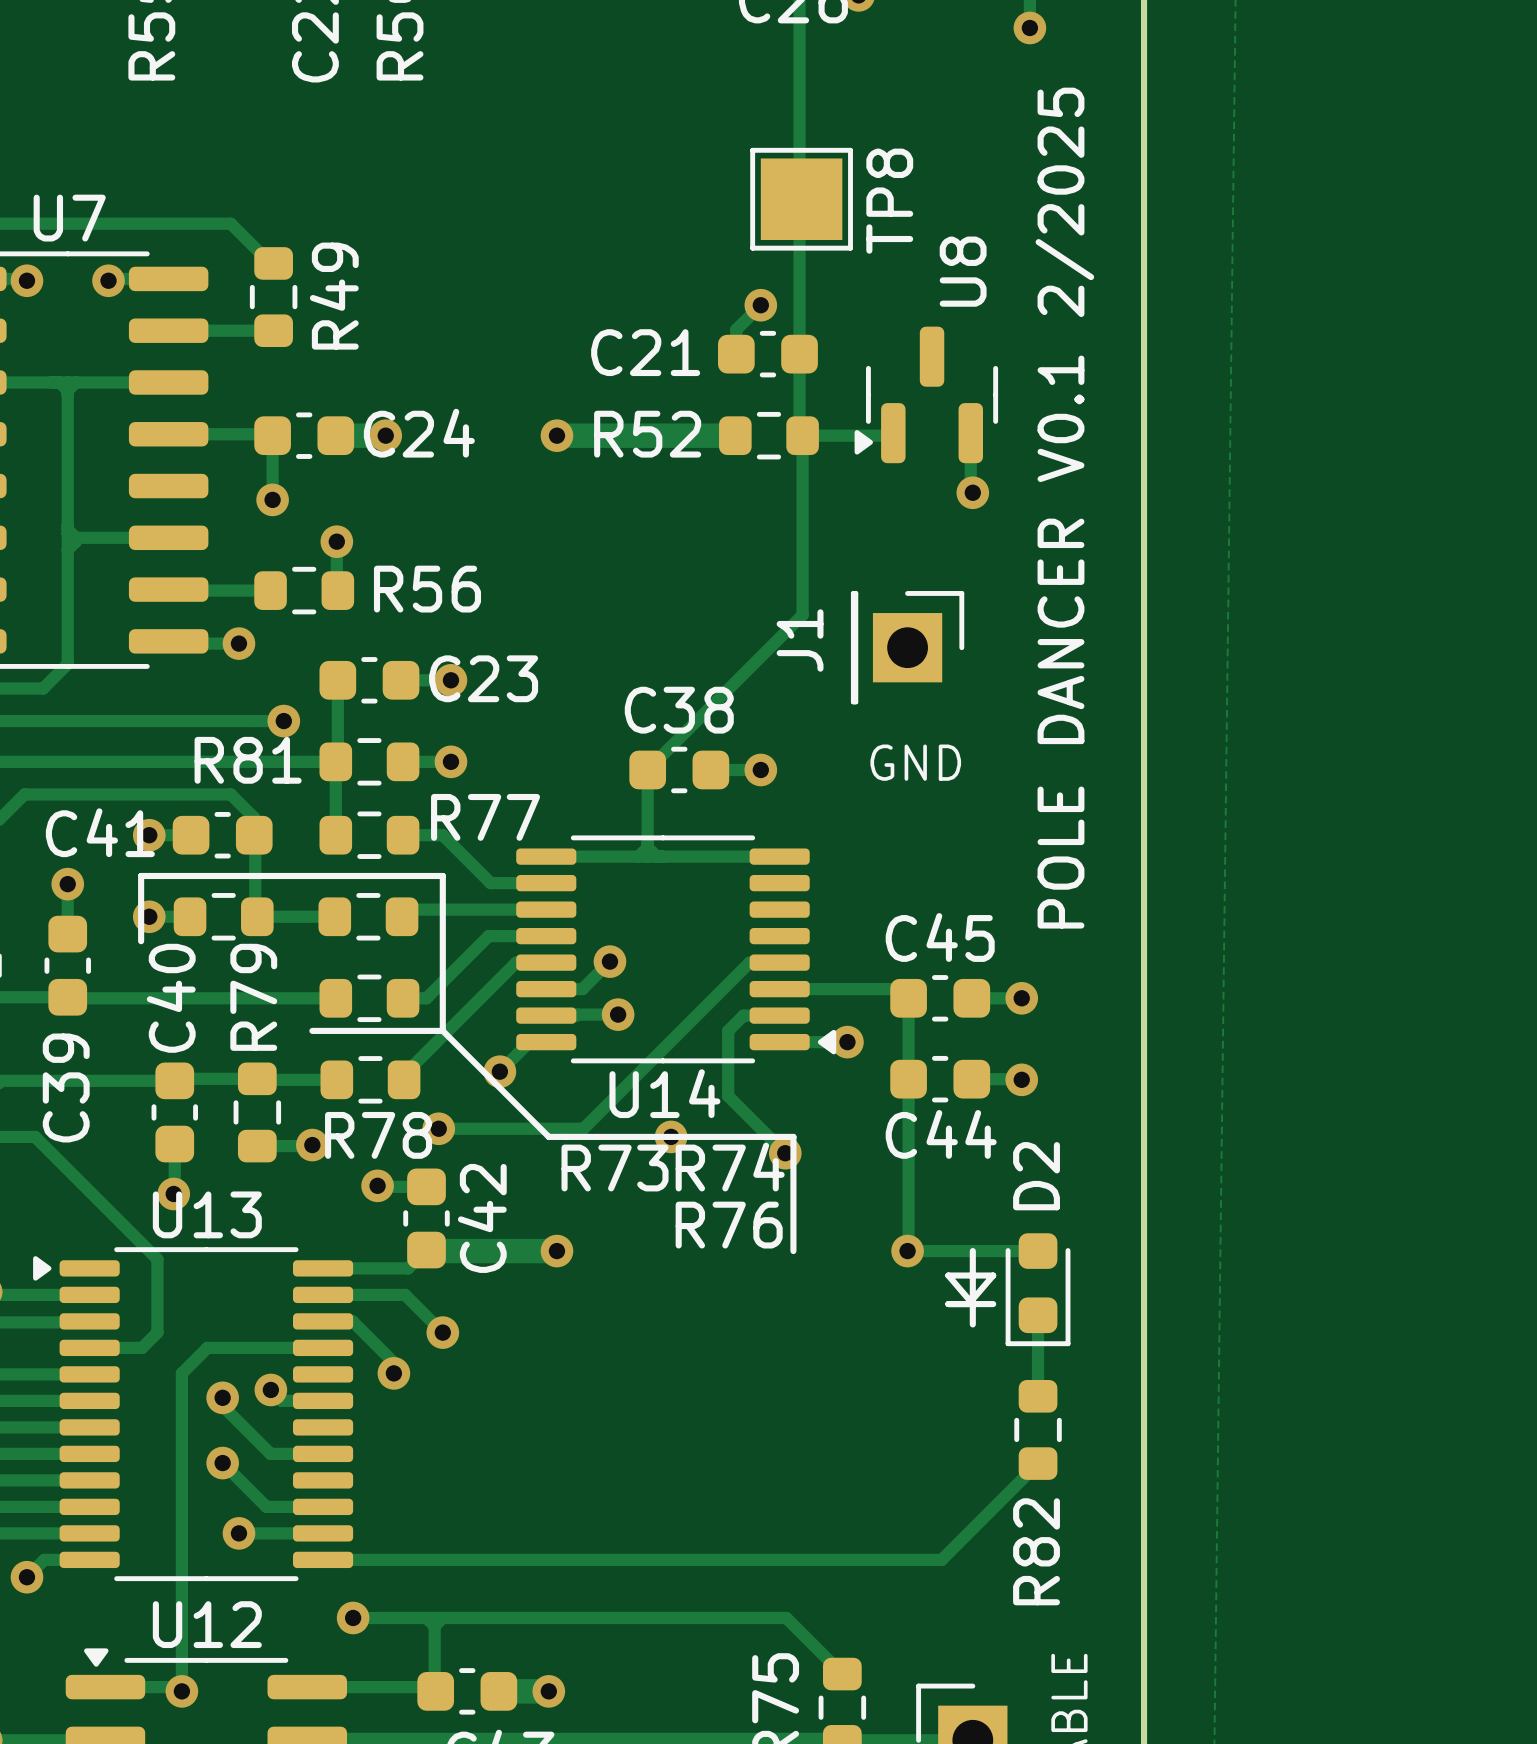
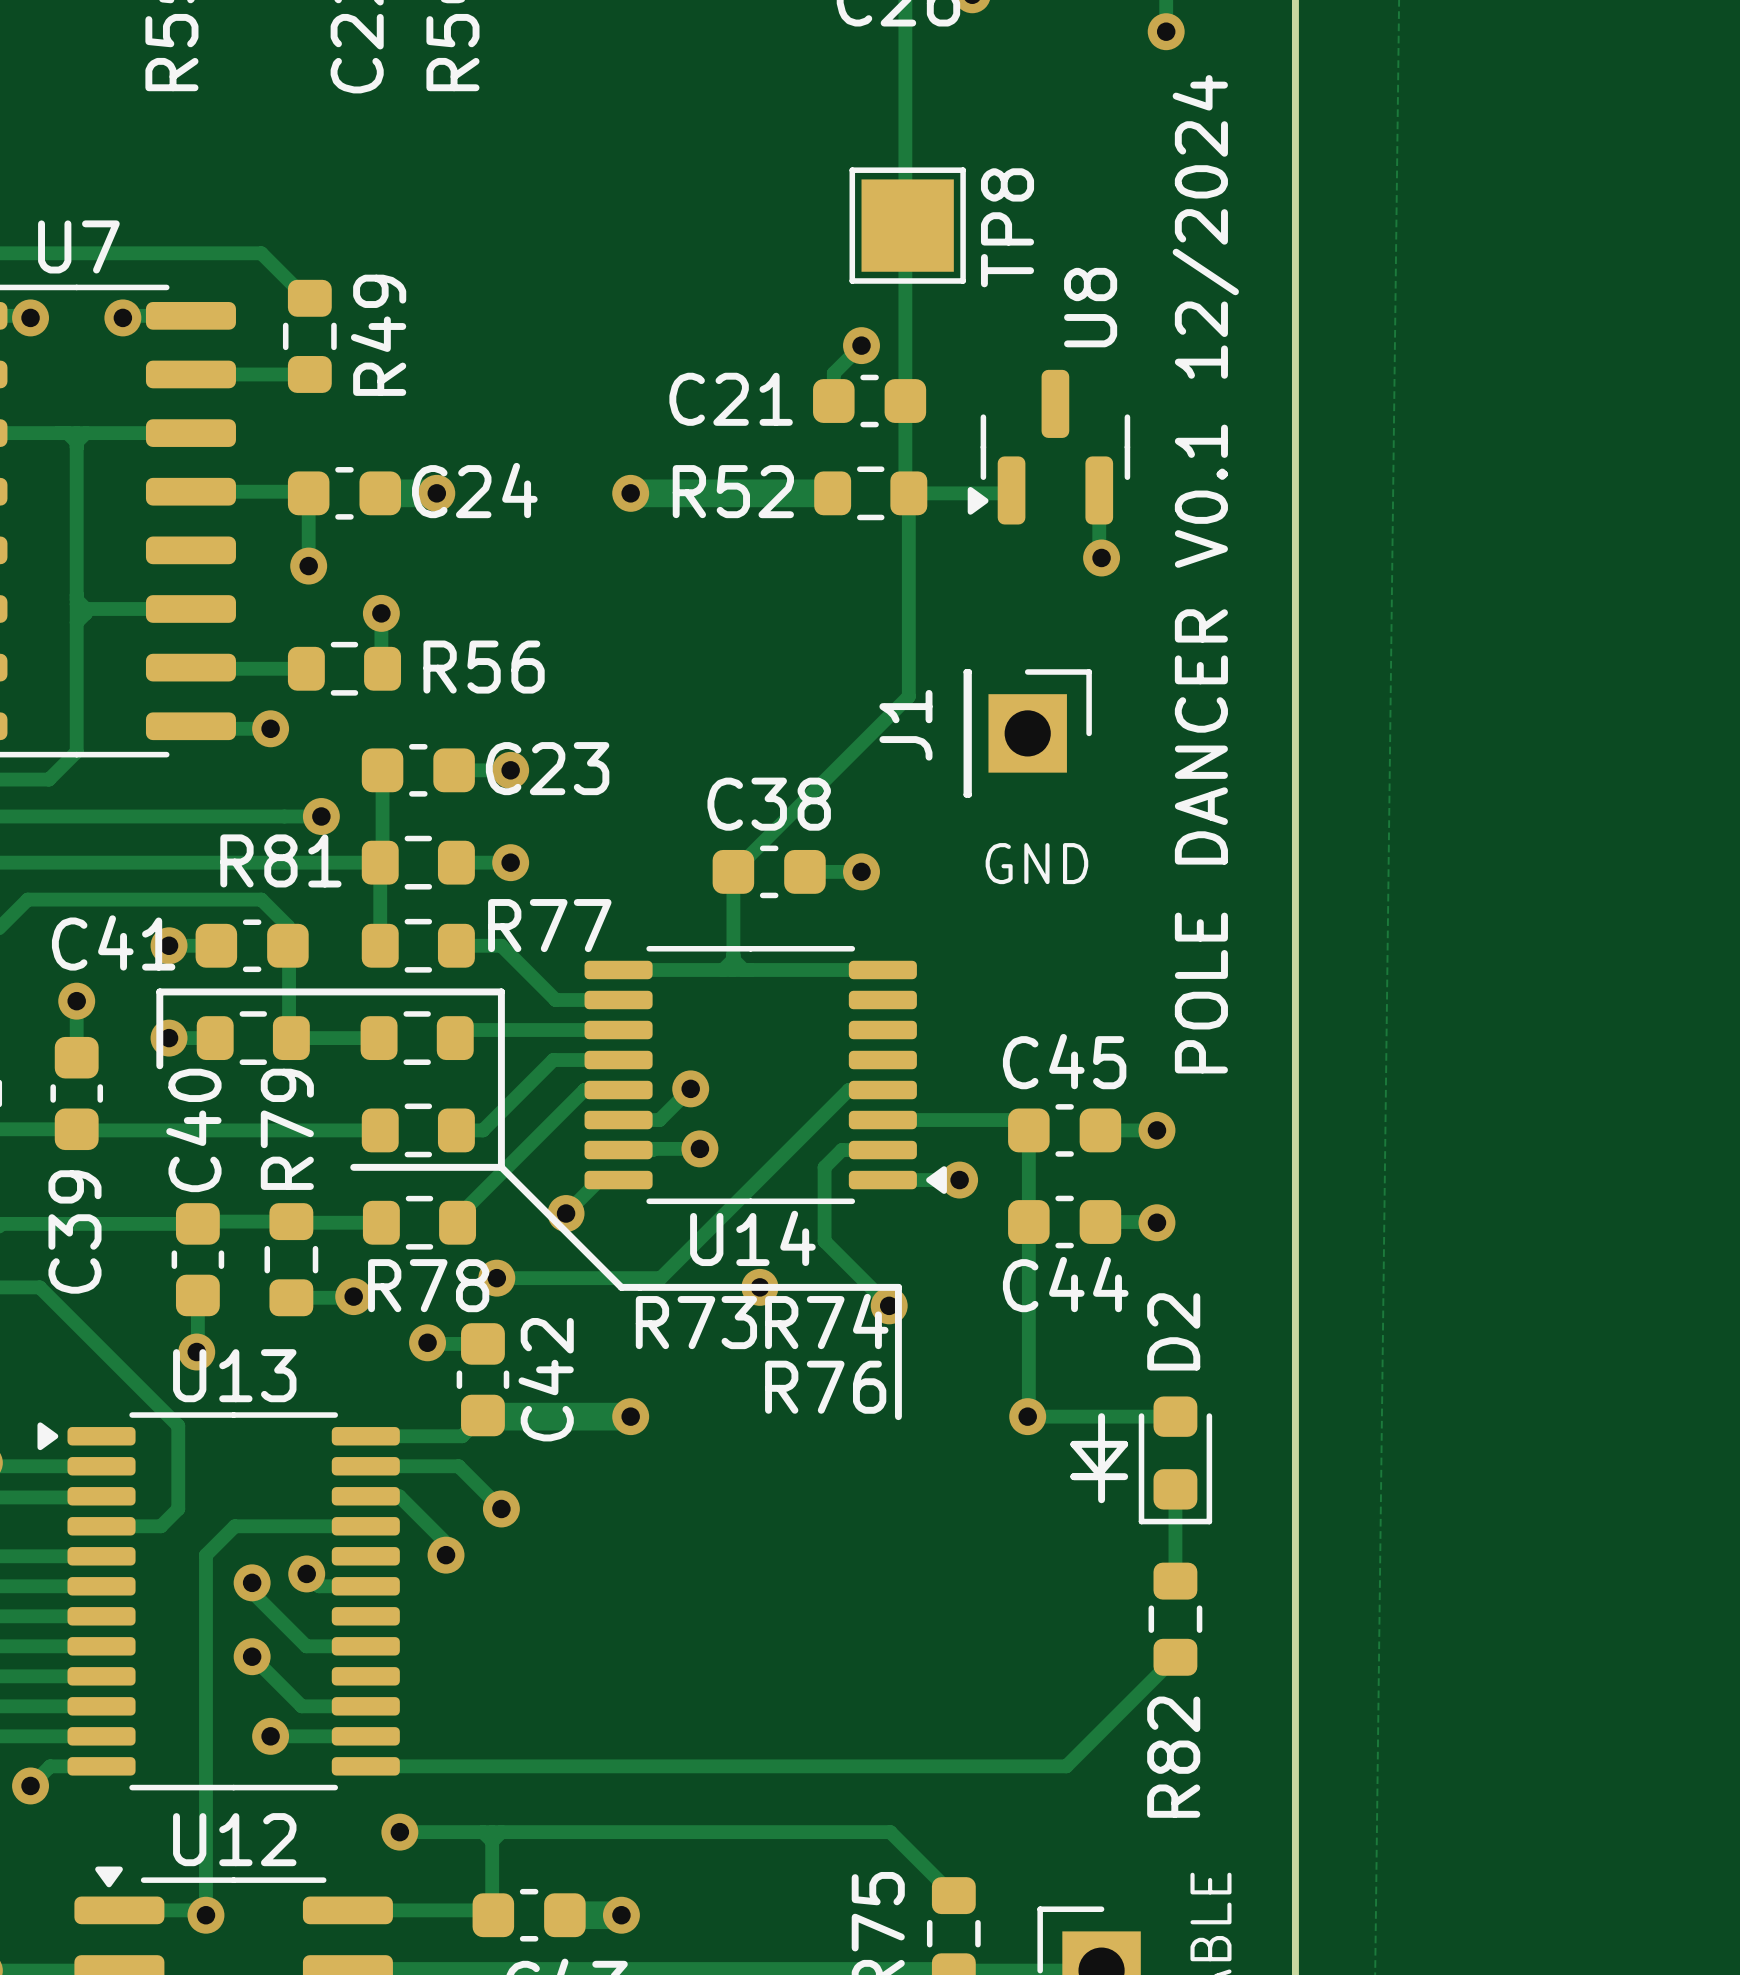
text: POLE DANCER V0.1 2/2025 (1064, 508) -> POLE DANCER V0.1 12/2024 (1205, 574)

